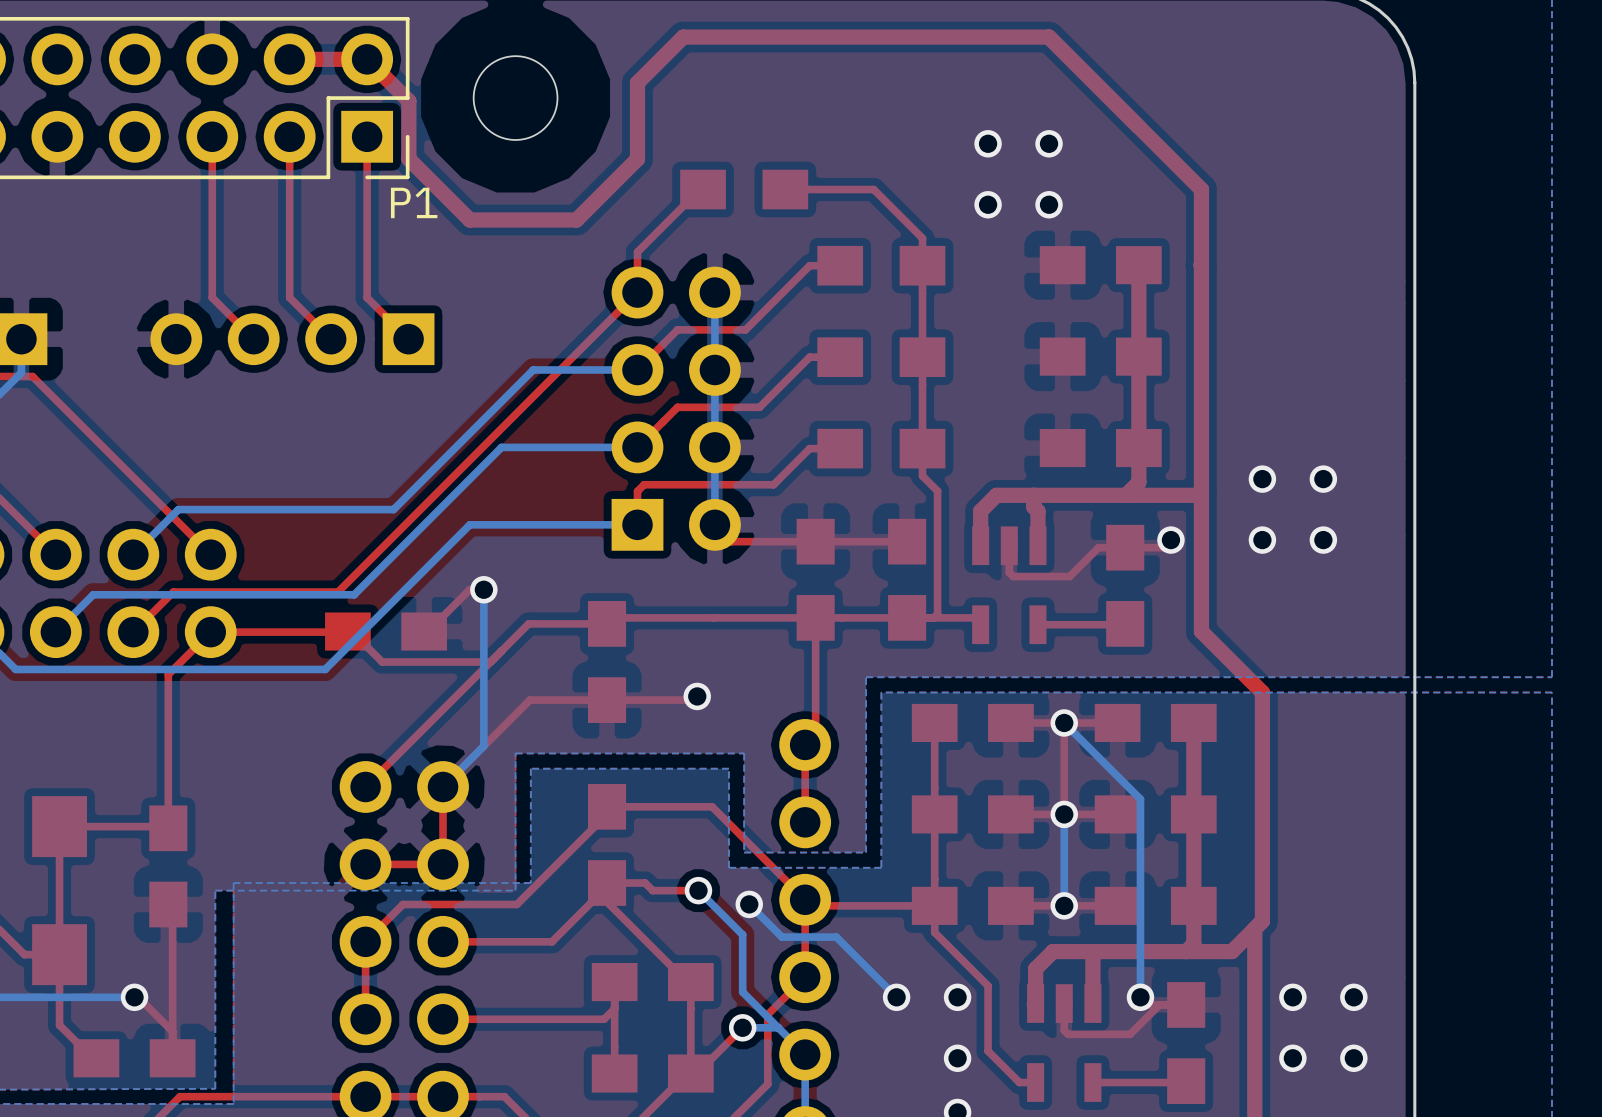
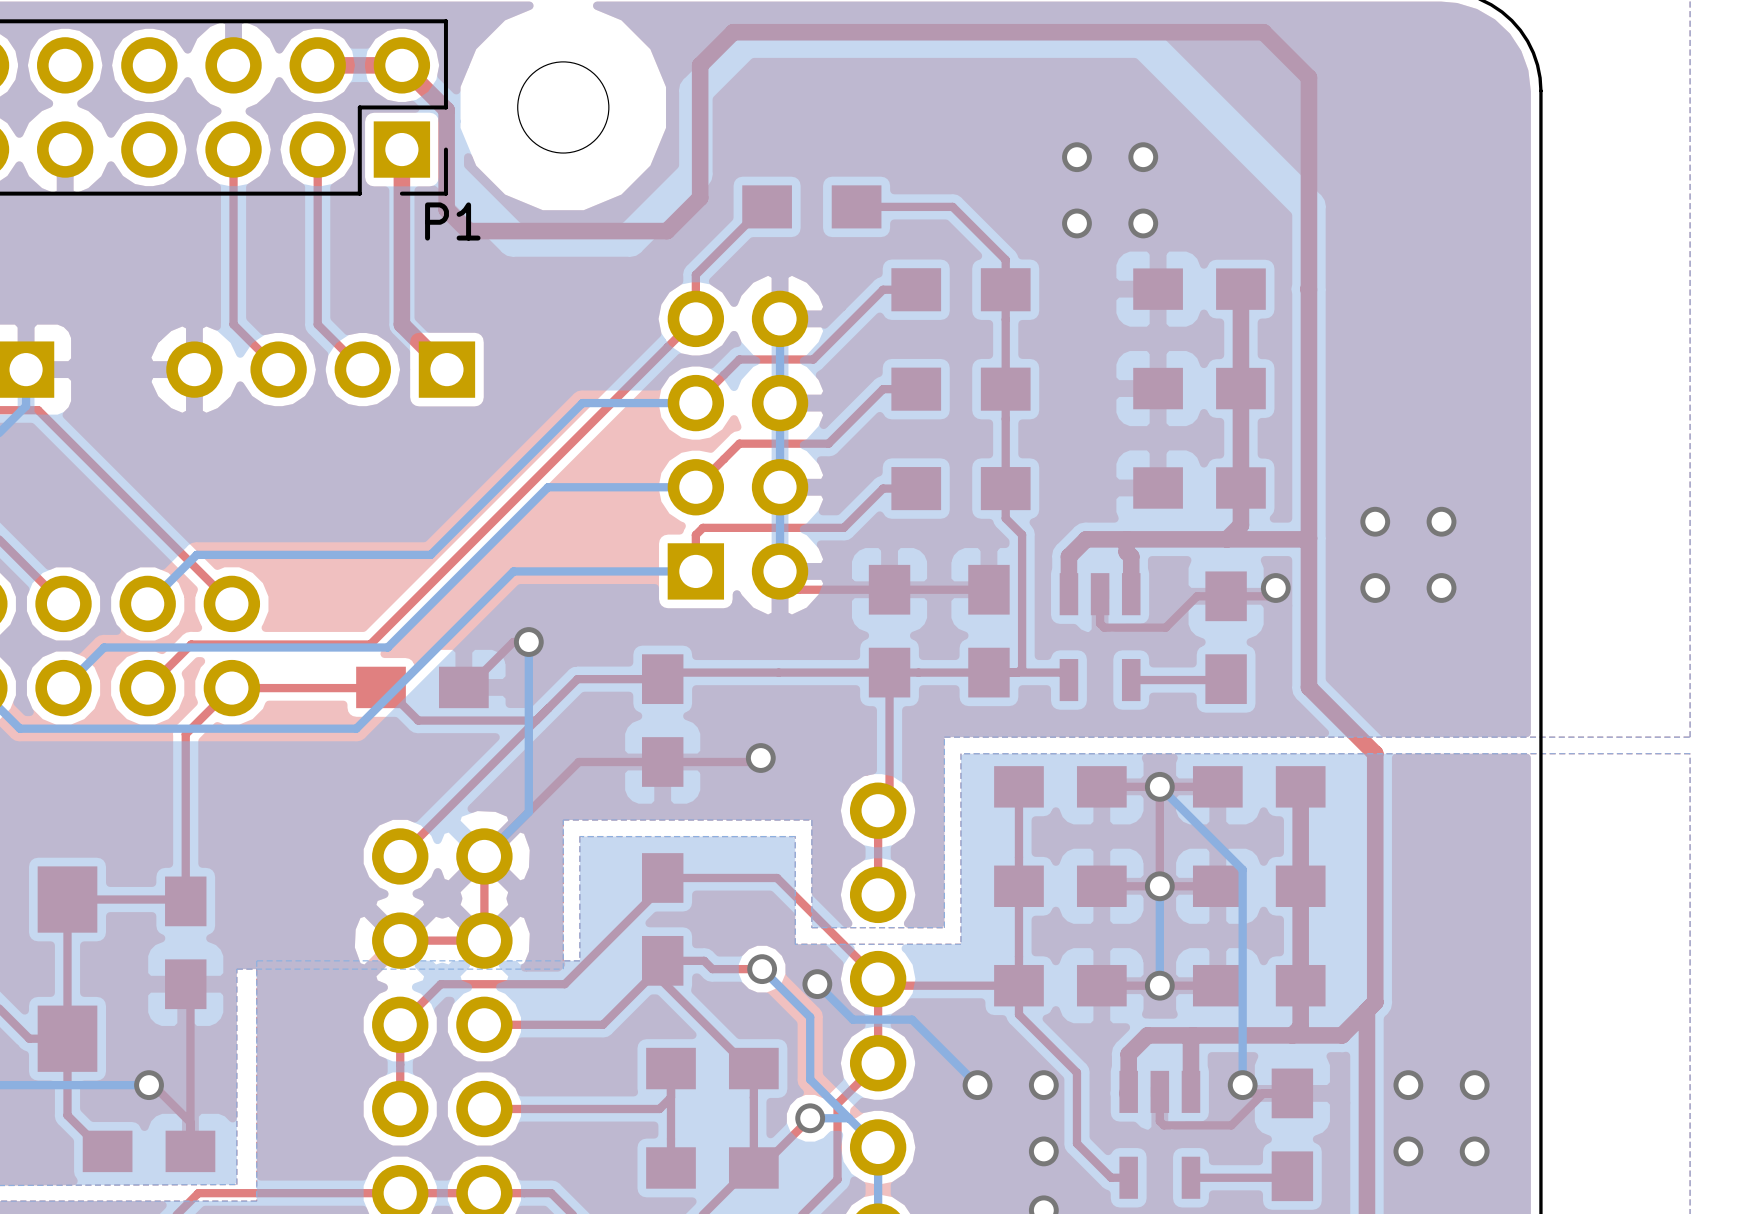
top track: (408, 100) (408, 159) (469, 220) (576, 220) (637, 159) (637, 82) (683, 37) (1049, 37) (1201, 189) -> (446, 110) (446, 209) (468, 231) (667, 231) (700, 197) (700, 65) (733, 32) (1263, 32) (1308, 77) (1308, 206)
top track width: thin (367, 136) (367, 297) (408, 339) -> thick (401, 149) (401, 324) (446, 369)

